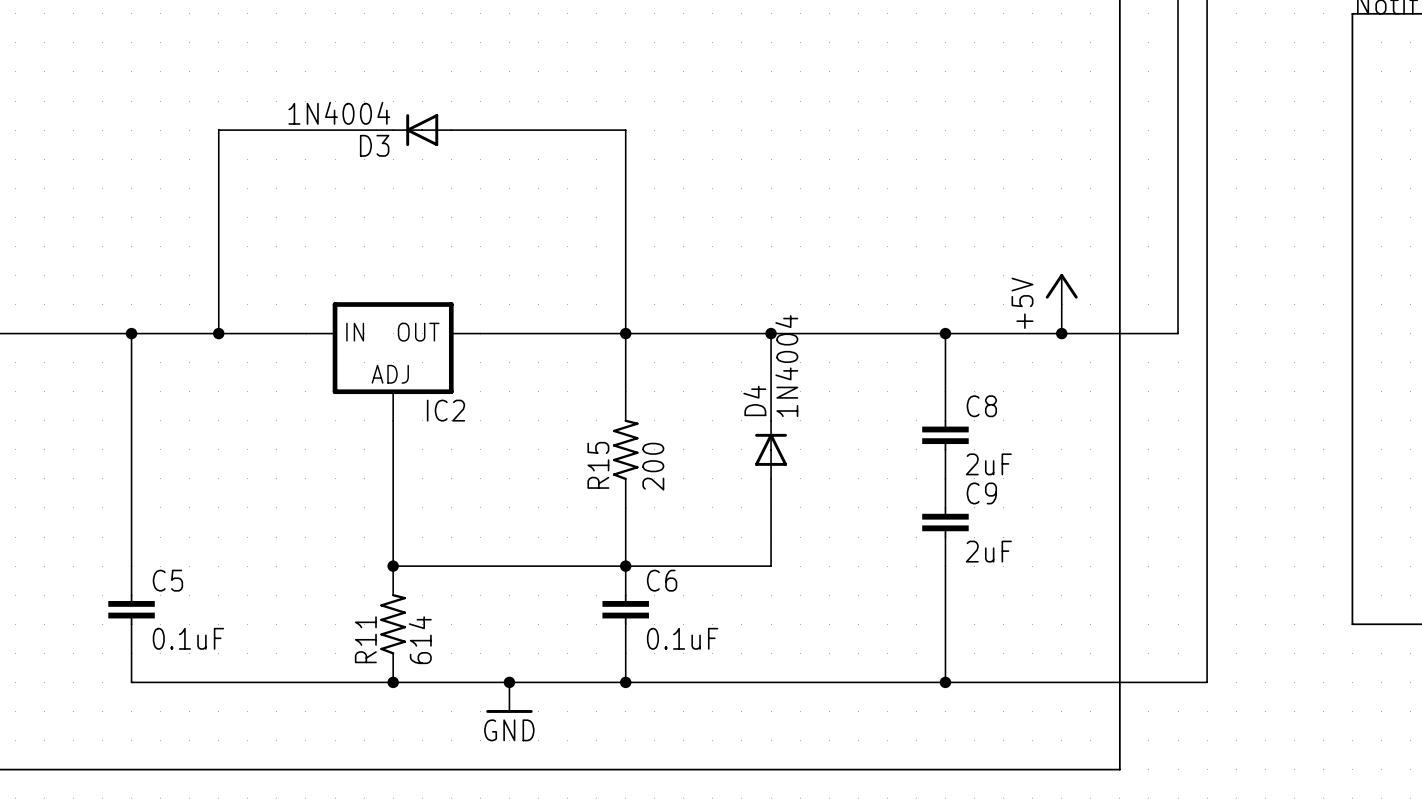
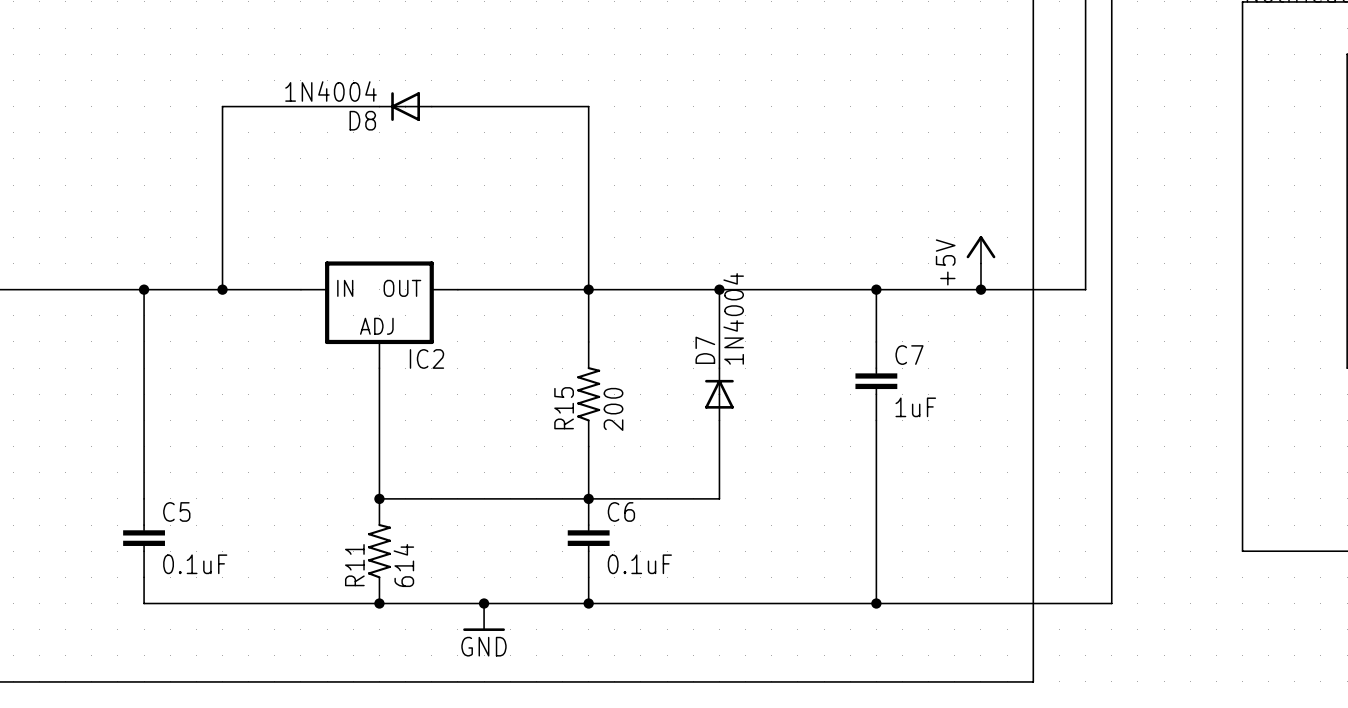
D3 name: D3 (374, 145) -> D8 (362, 120)
D4 name: D4 (754, 400) -> D7 (705, 350)
C8 name: C8 (981, 406) -> C7 (909, 355)
C8 value: 2uF (988, 464) -> 1uF (915, 407)
C9: 2uF (945, 522) -> none

